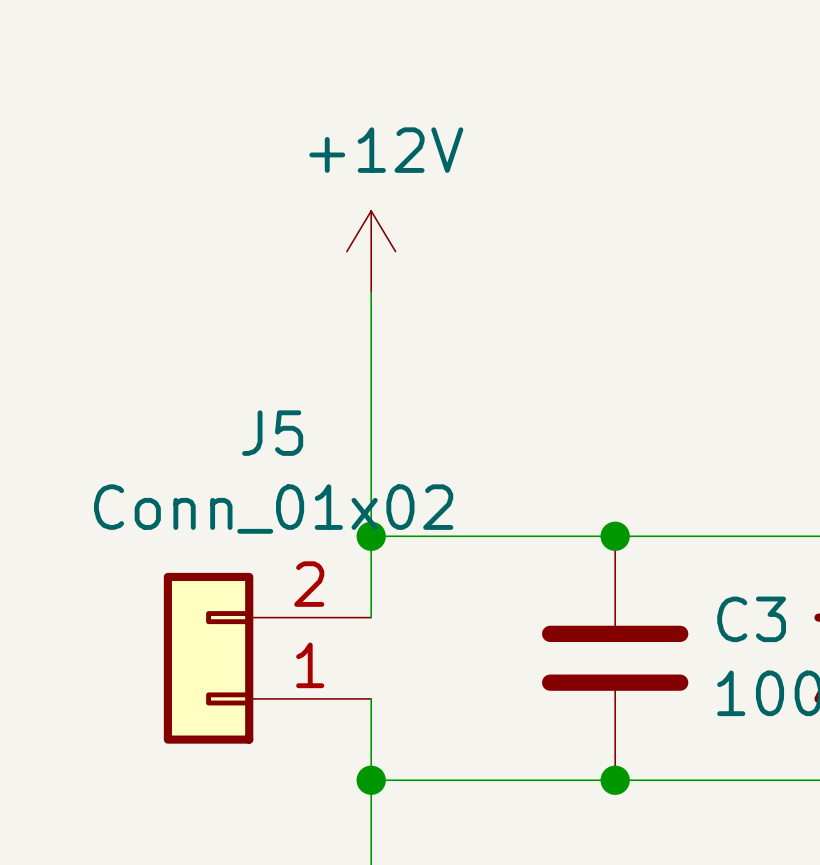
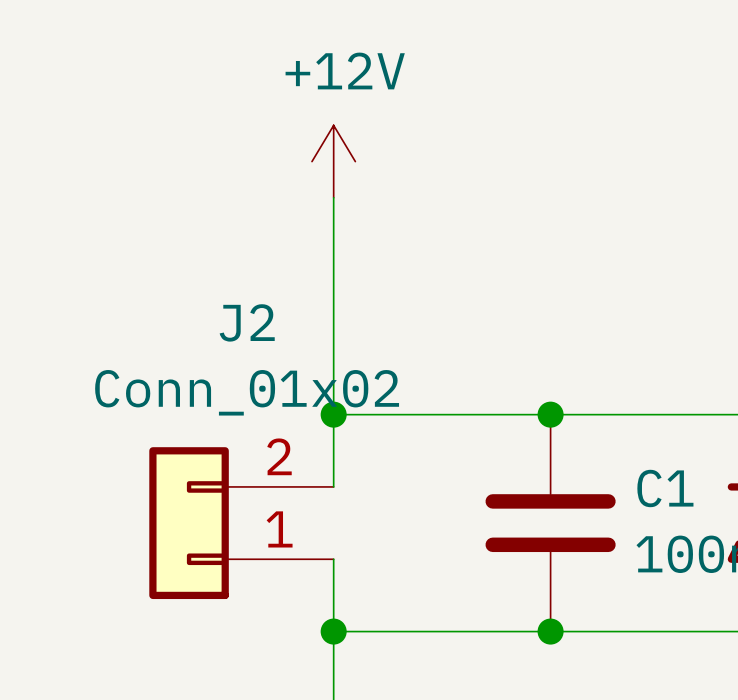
J5 name: J5 (272, 433) -> J2 (247, 322)
C3 name: C3 (751, 619) -> C1 (665, 488)

